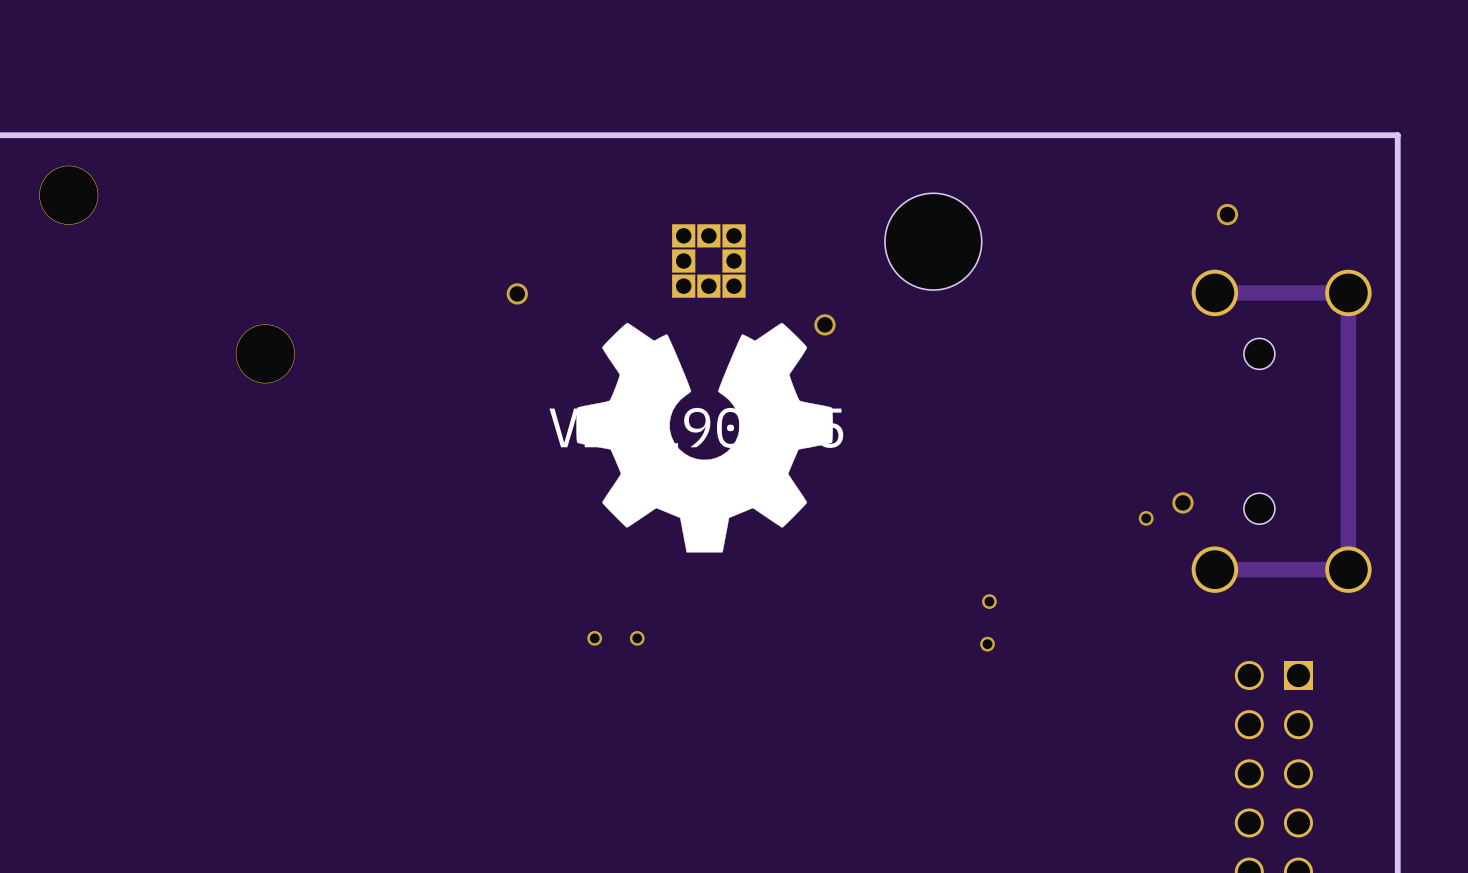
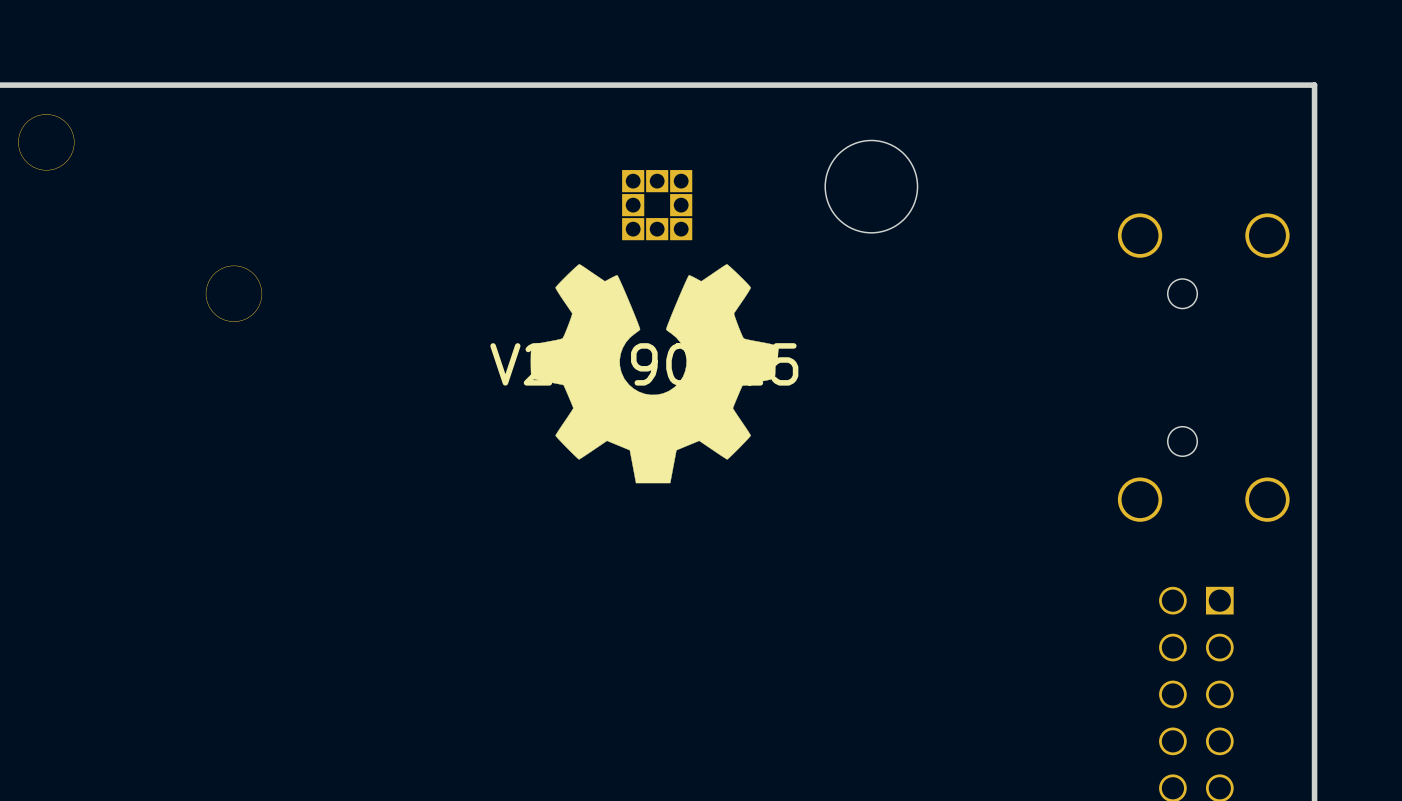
via: (1227, 214) -> none
track: (1214, 292) (1348, 292) (1348, 569) (1214, 569) -> none
via: (517, 293) -> none
via: (824, 324) -> none
via: (1182, 502) -> none
via: (1146, 518) -> none
via: (989, 601) -> none
via: (594, 638) -> none
via: (637, 638) -> none
via: (987, 644) -> none

